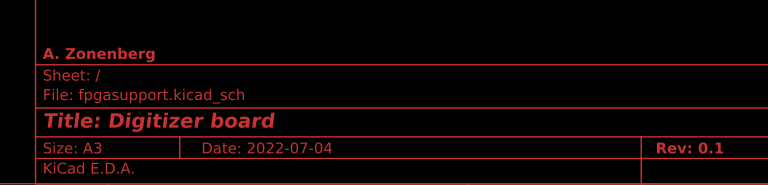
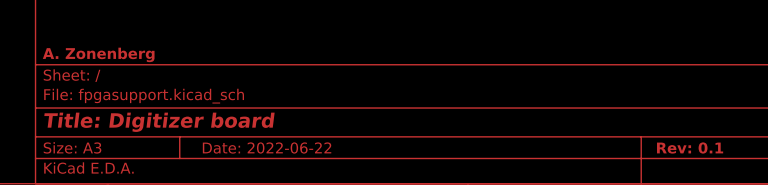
title block: Date: 2022-07-04 (267, 148) -> Date: 2022-06-22 (267, 148)

